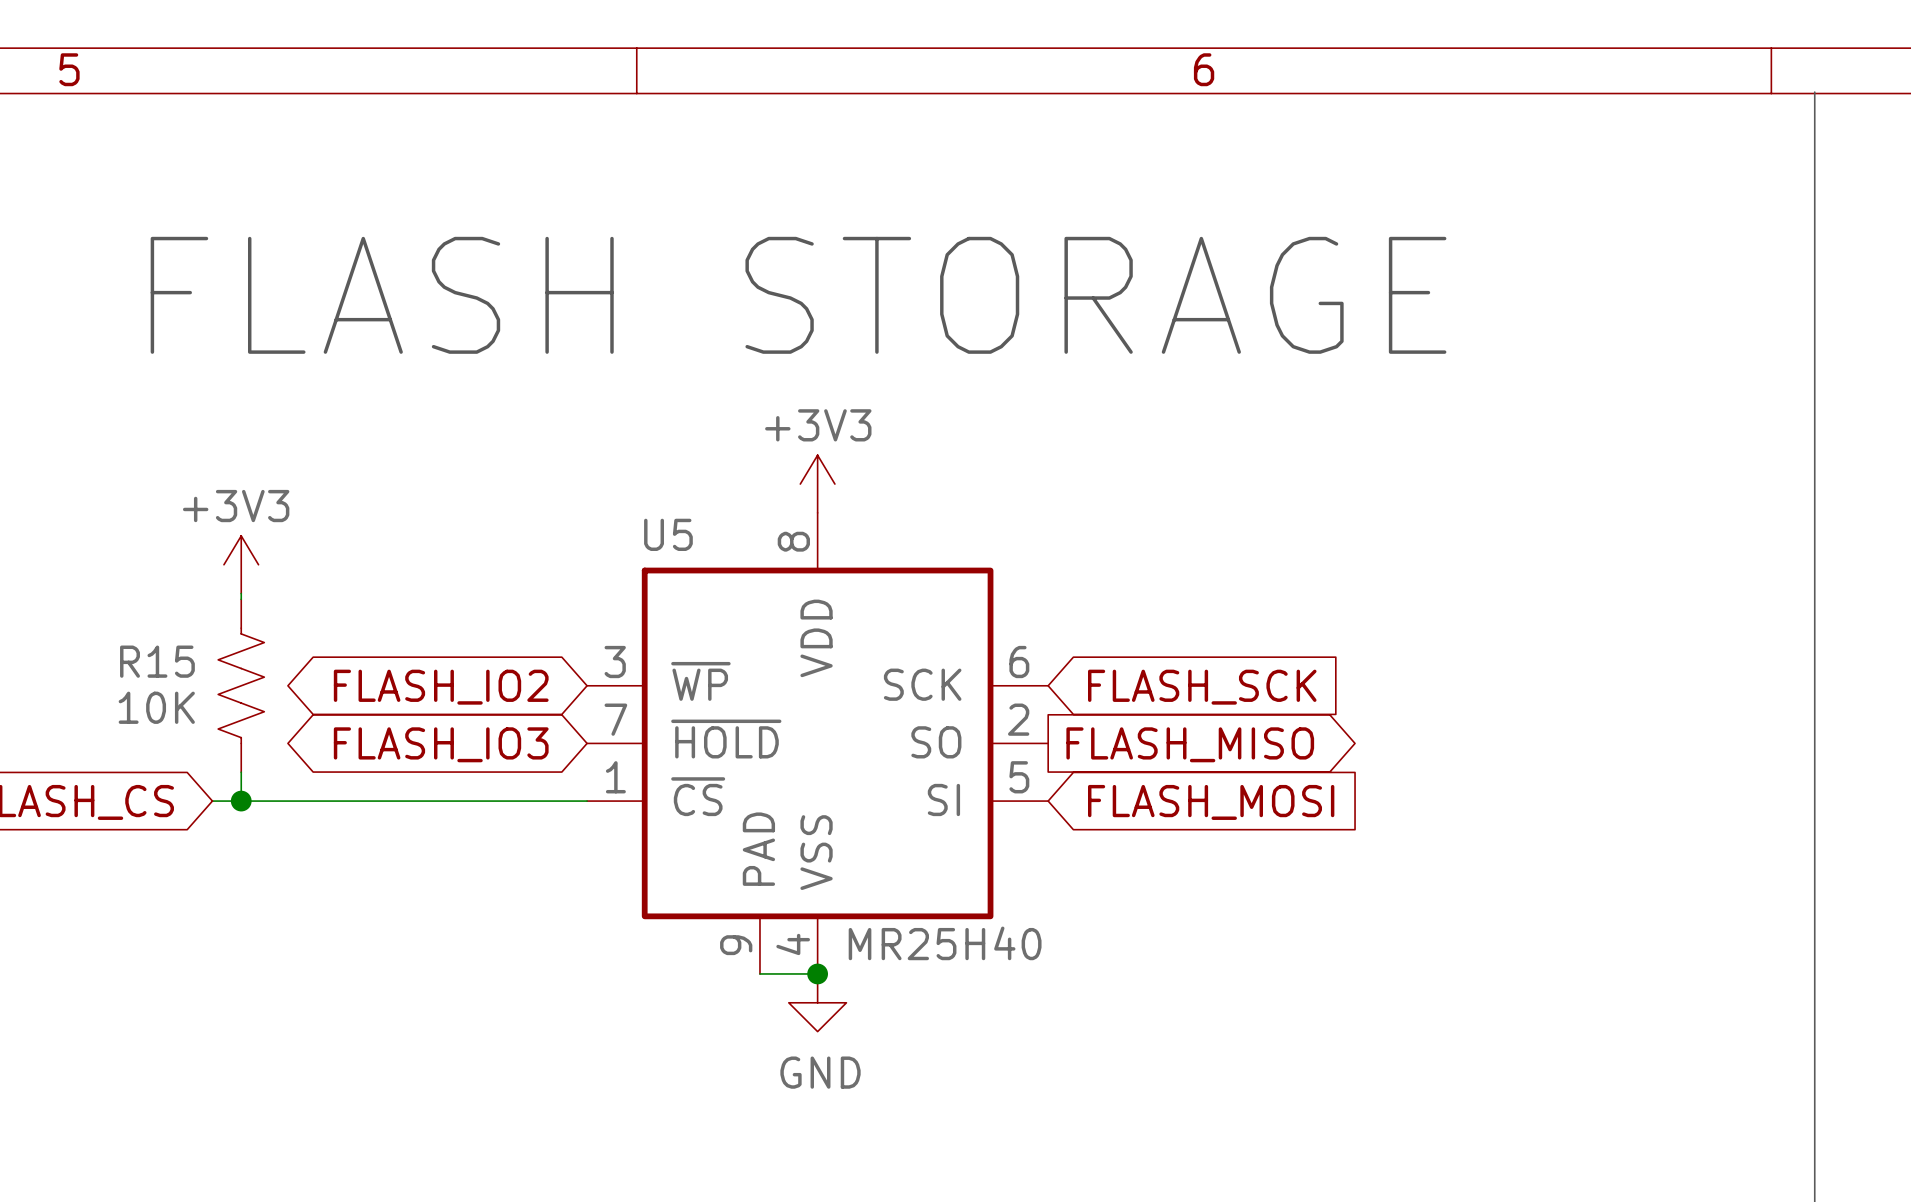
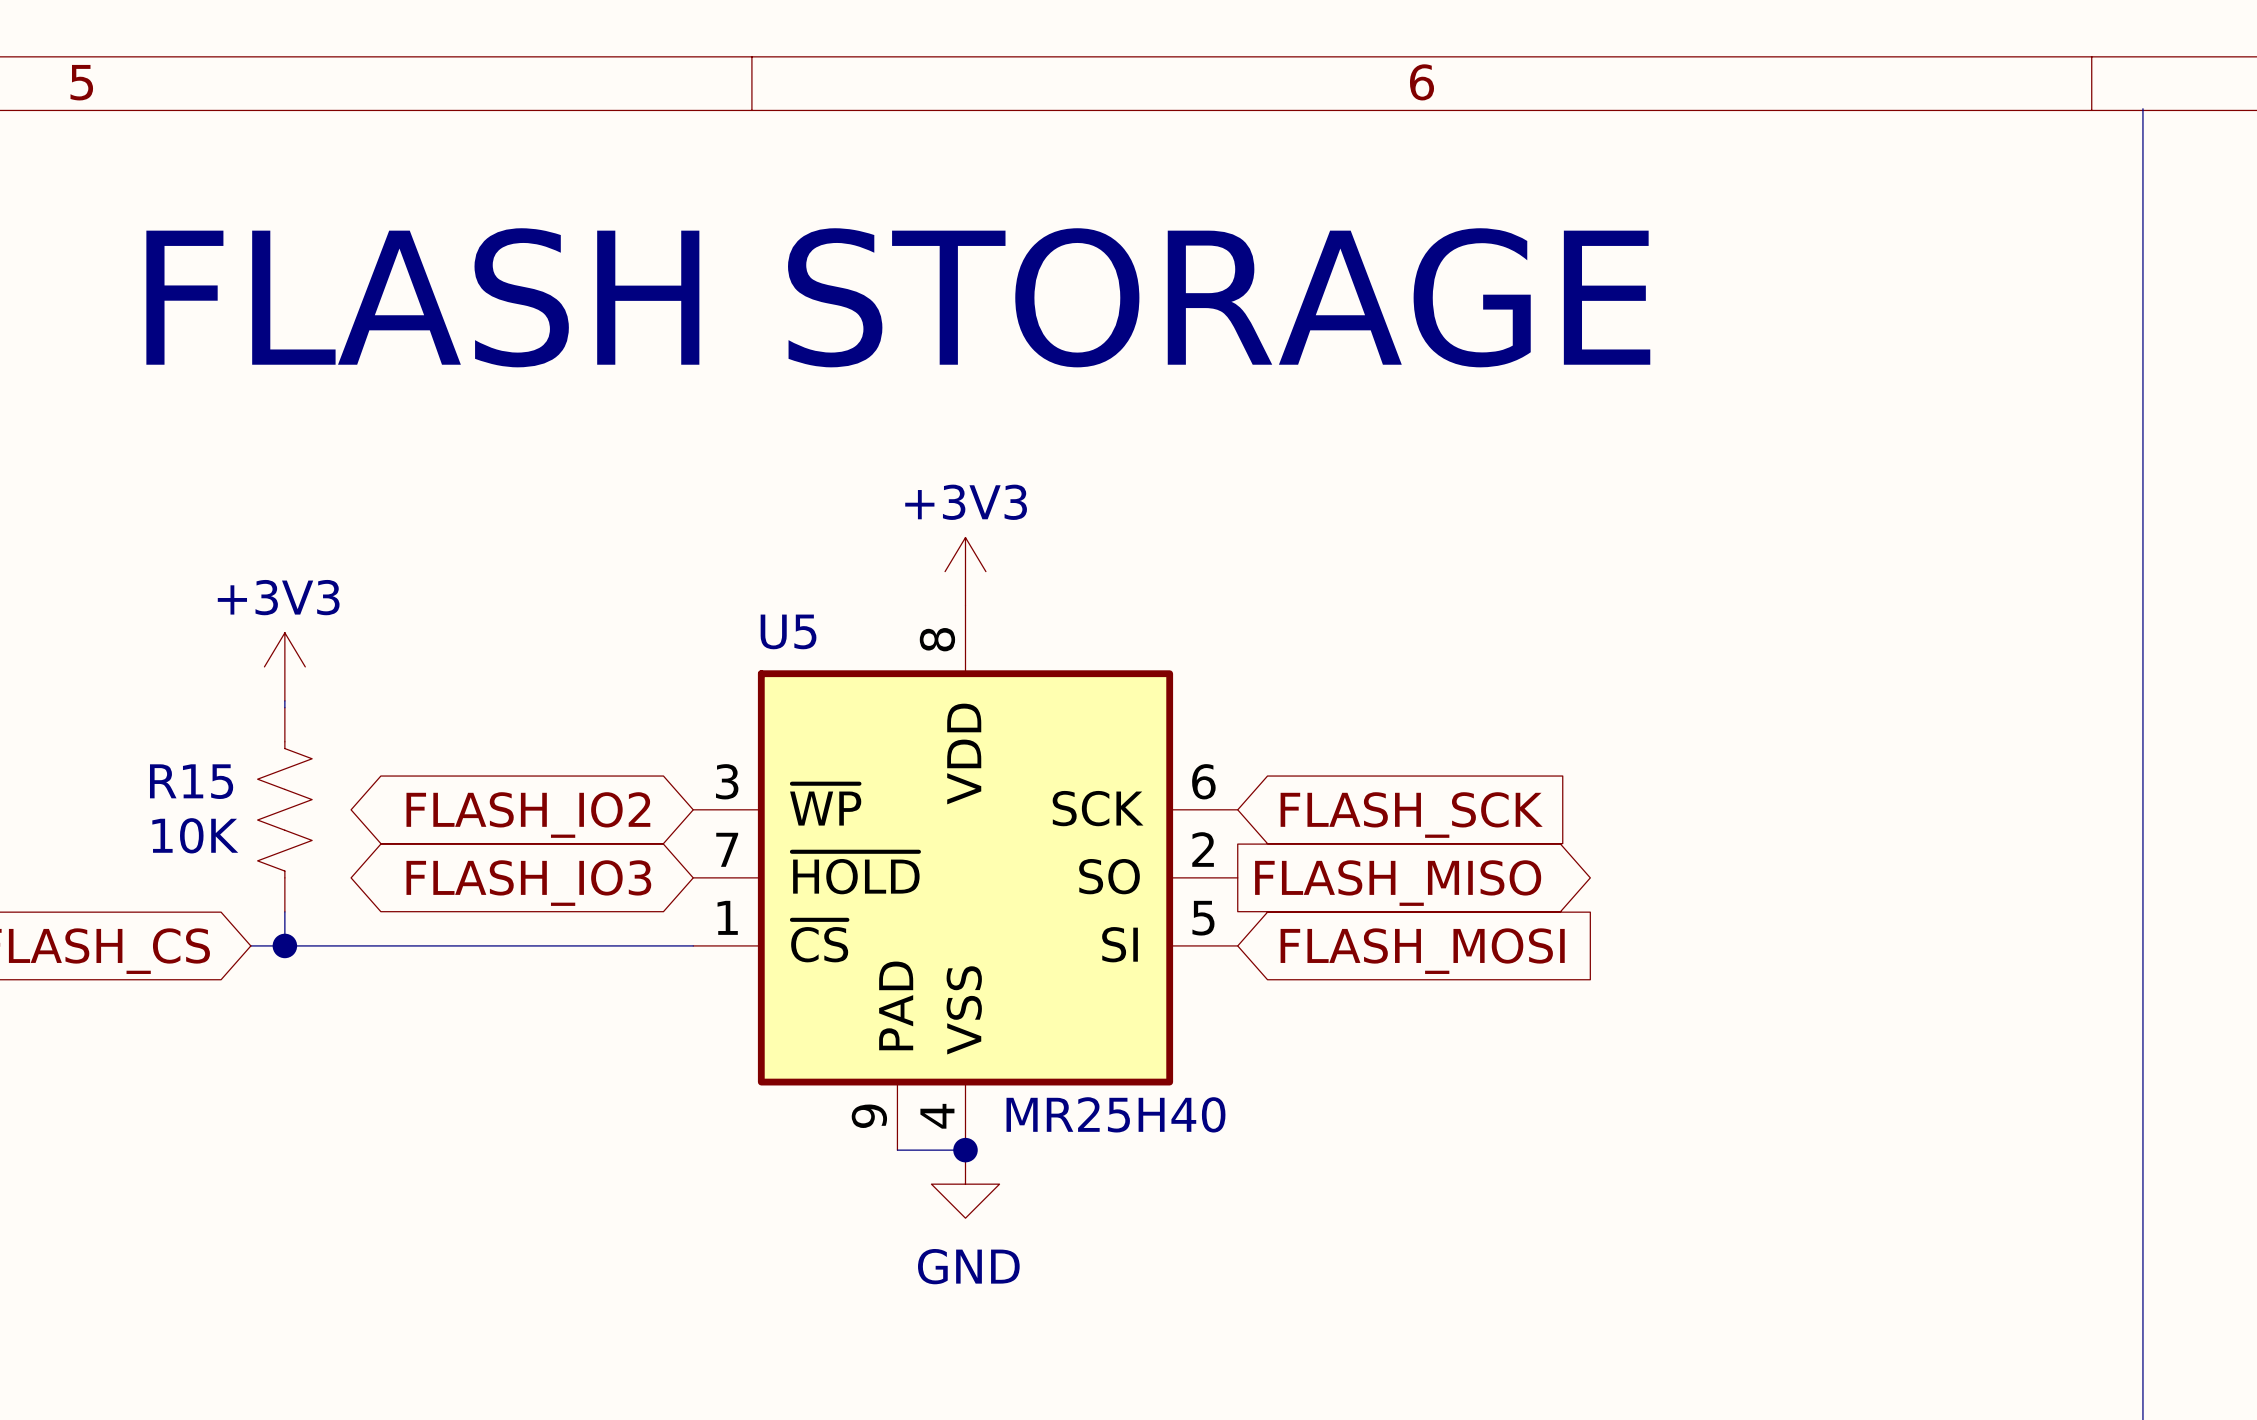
text position: FLASH STORAGE (798, 295) -> FLASH STORAGE (898, 297)

